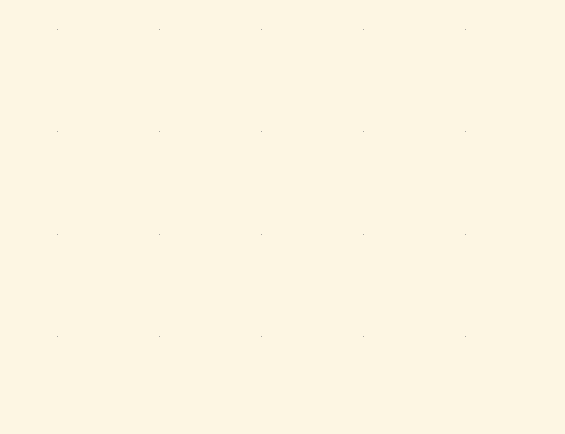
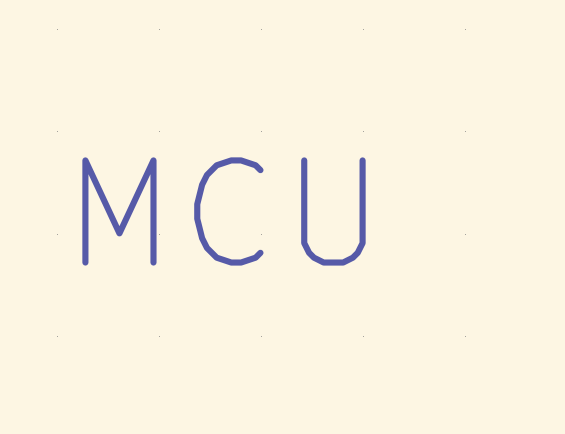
text: none -> MCU (224, 211)

